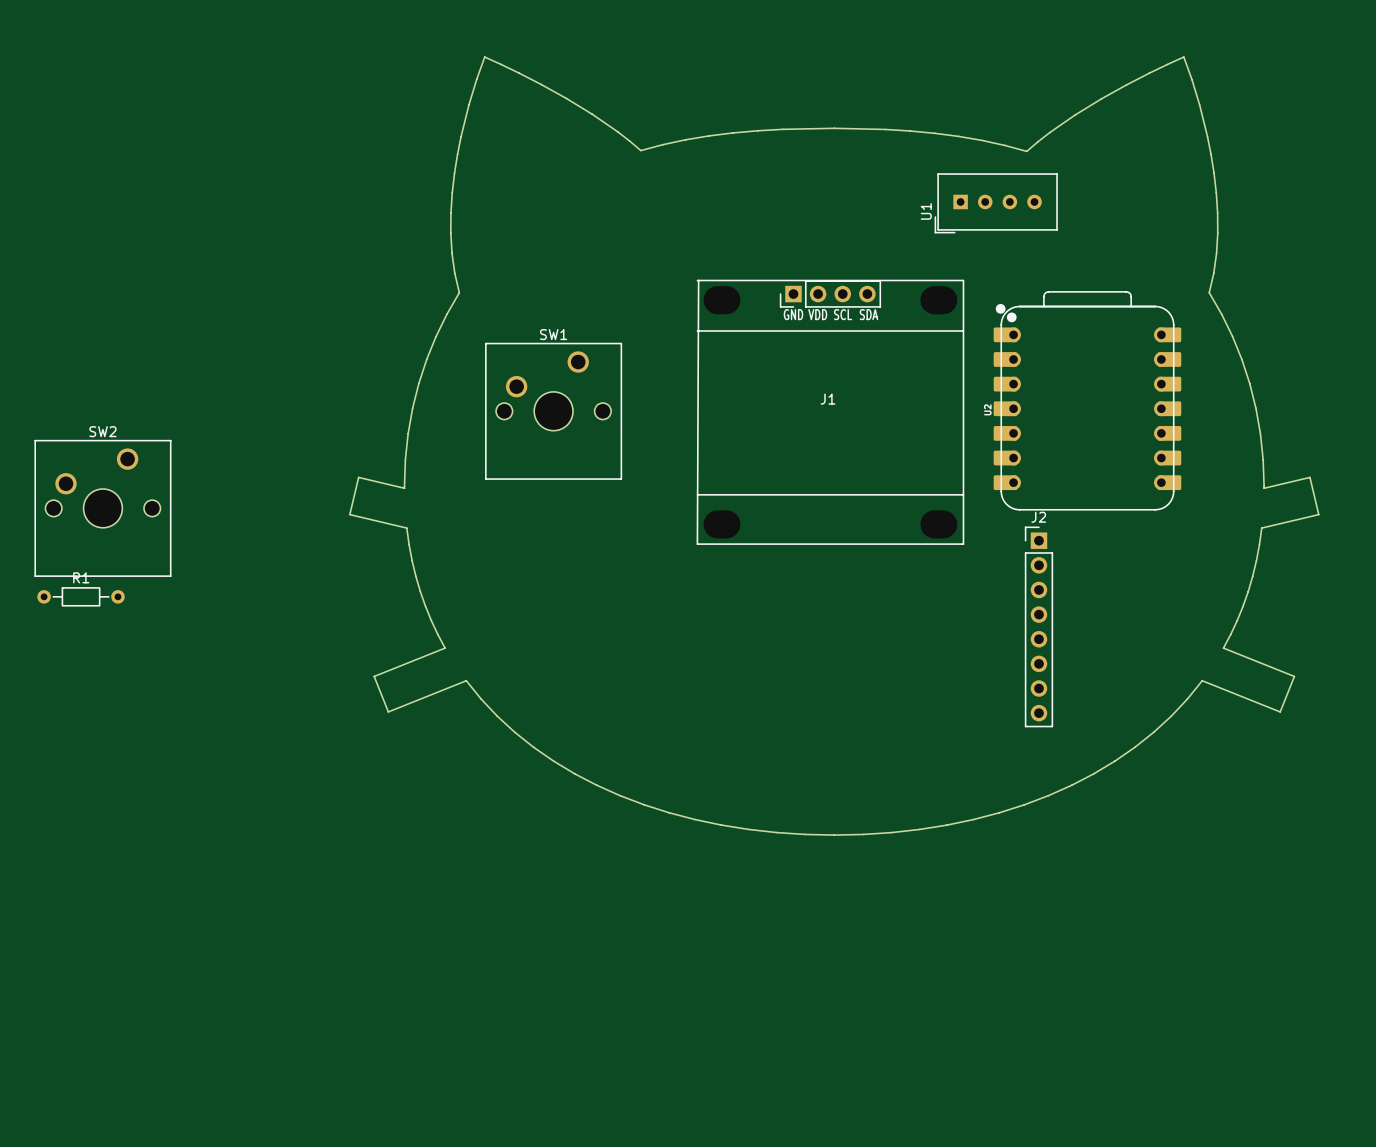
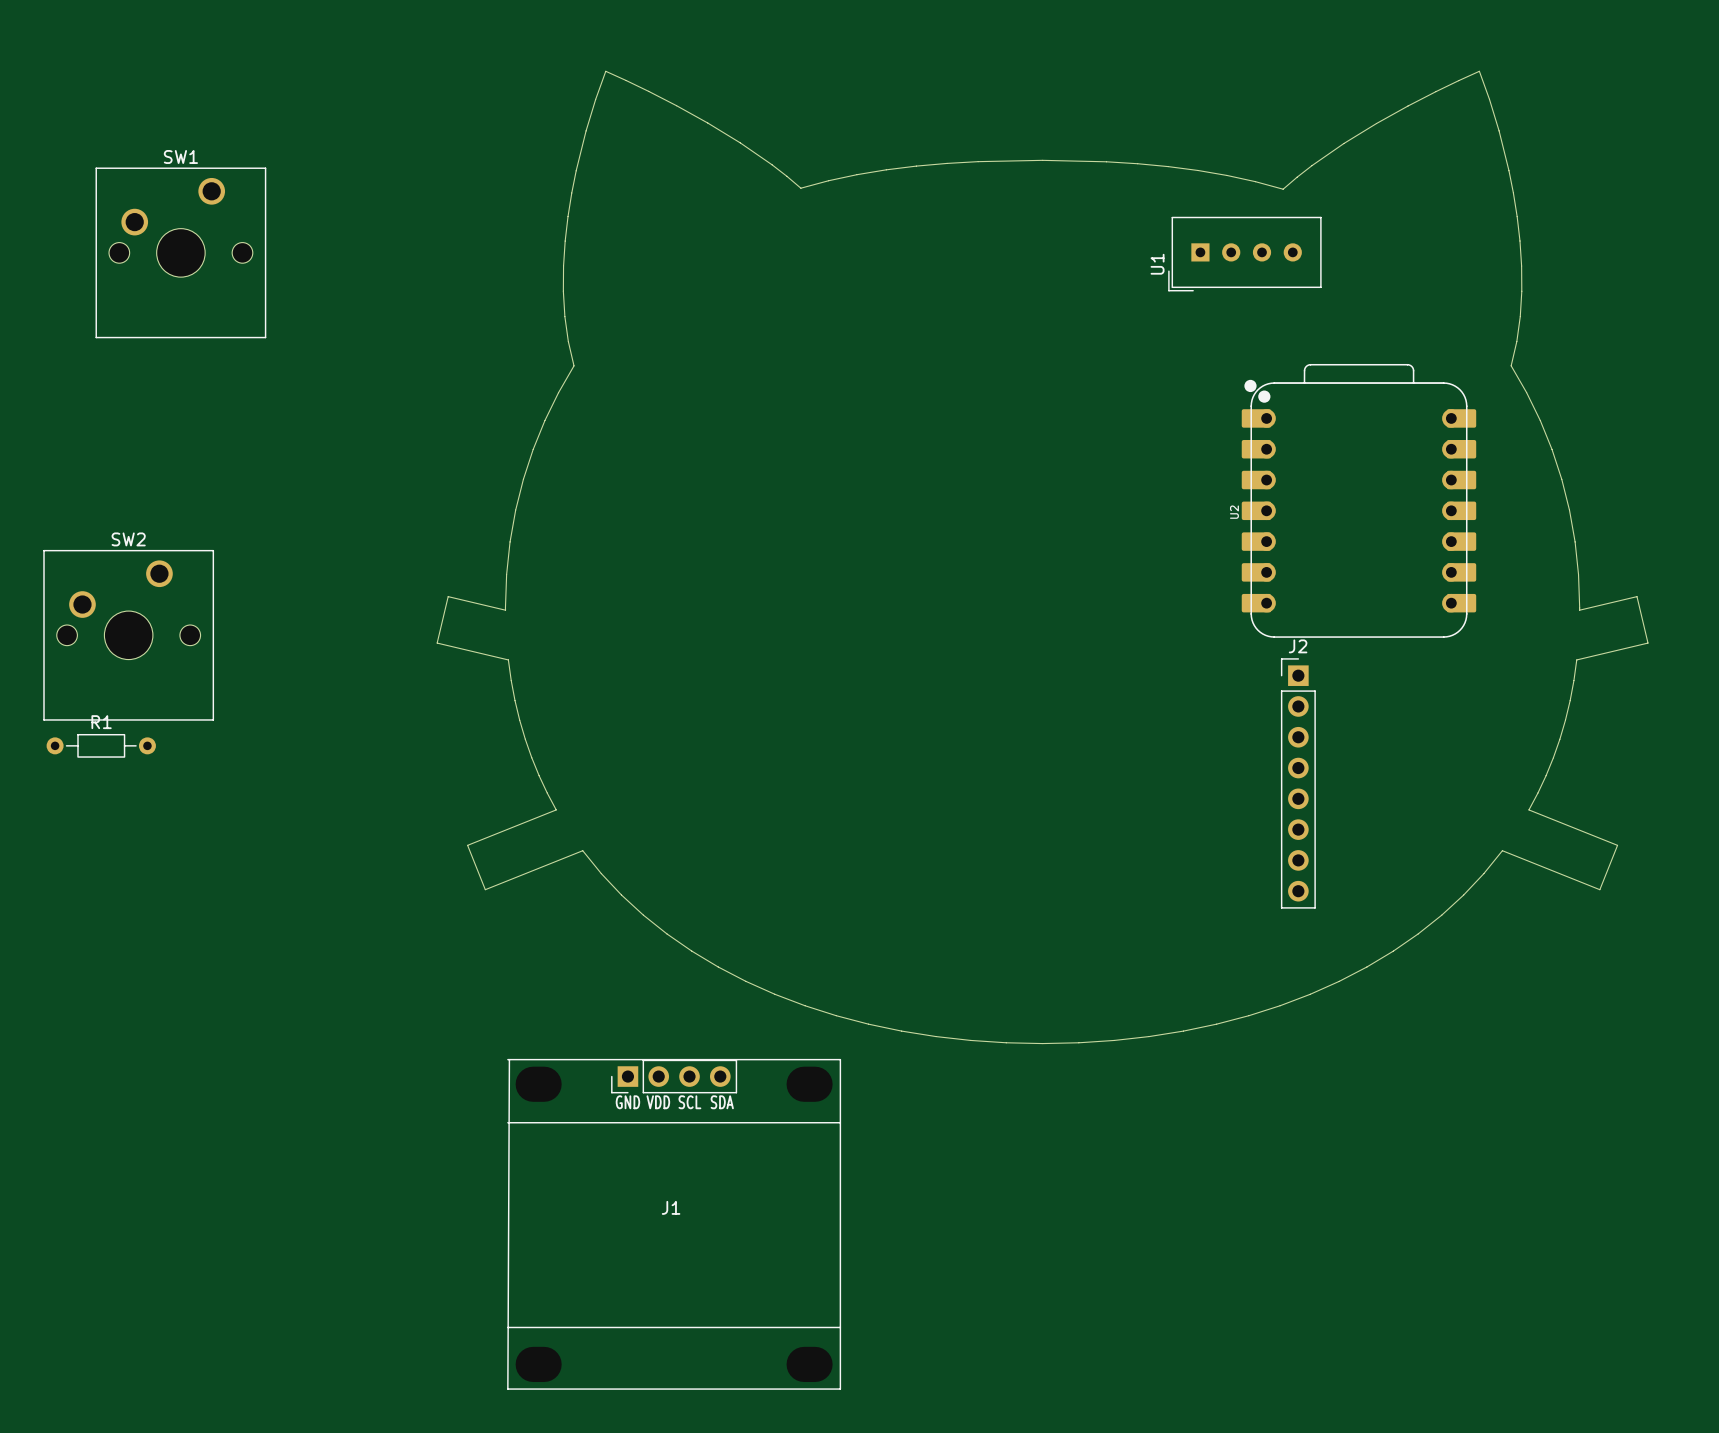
SW1 position: (553, 411) -> (180, 252)
J1 position: (830, 412) -> (674, 1224)

